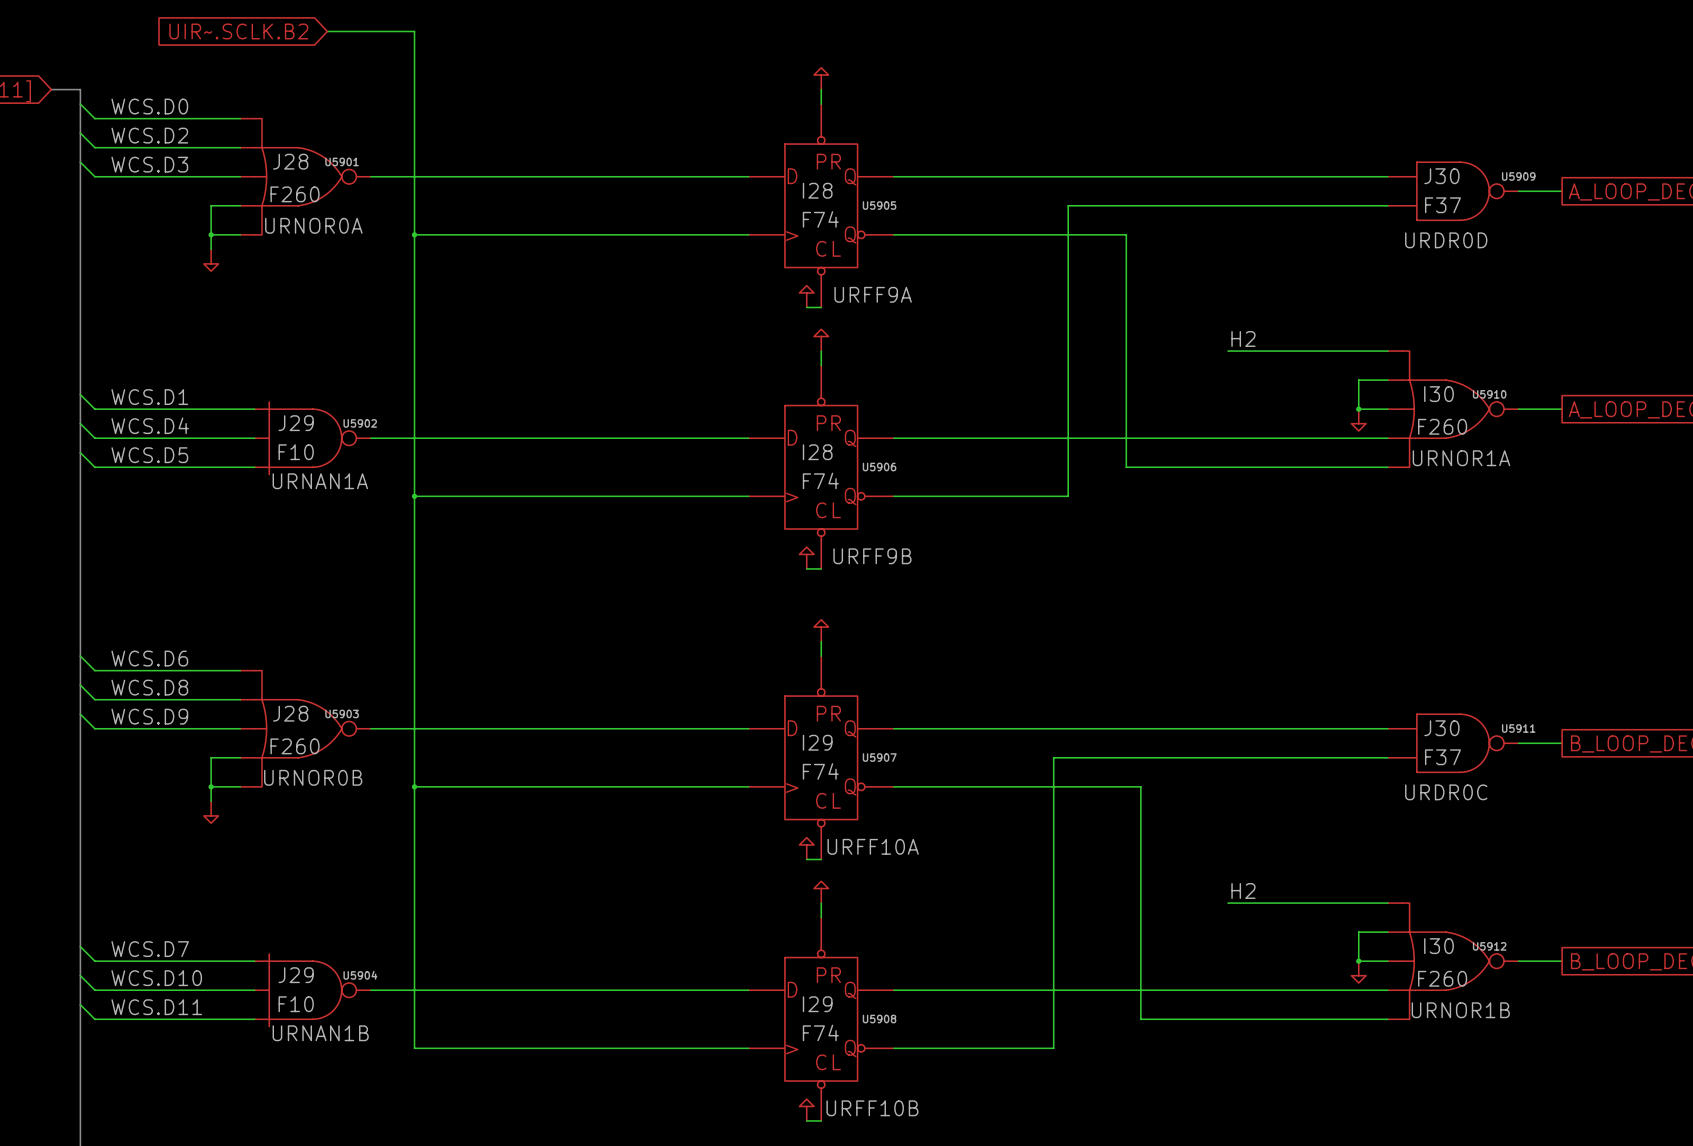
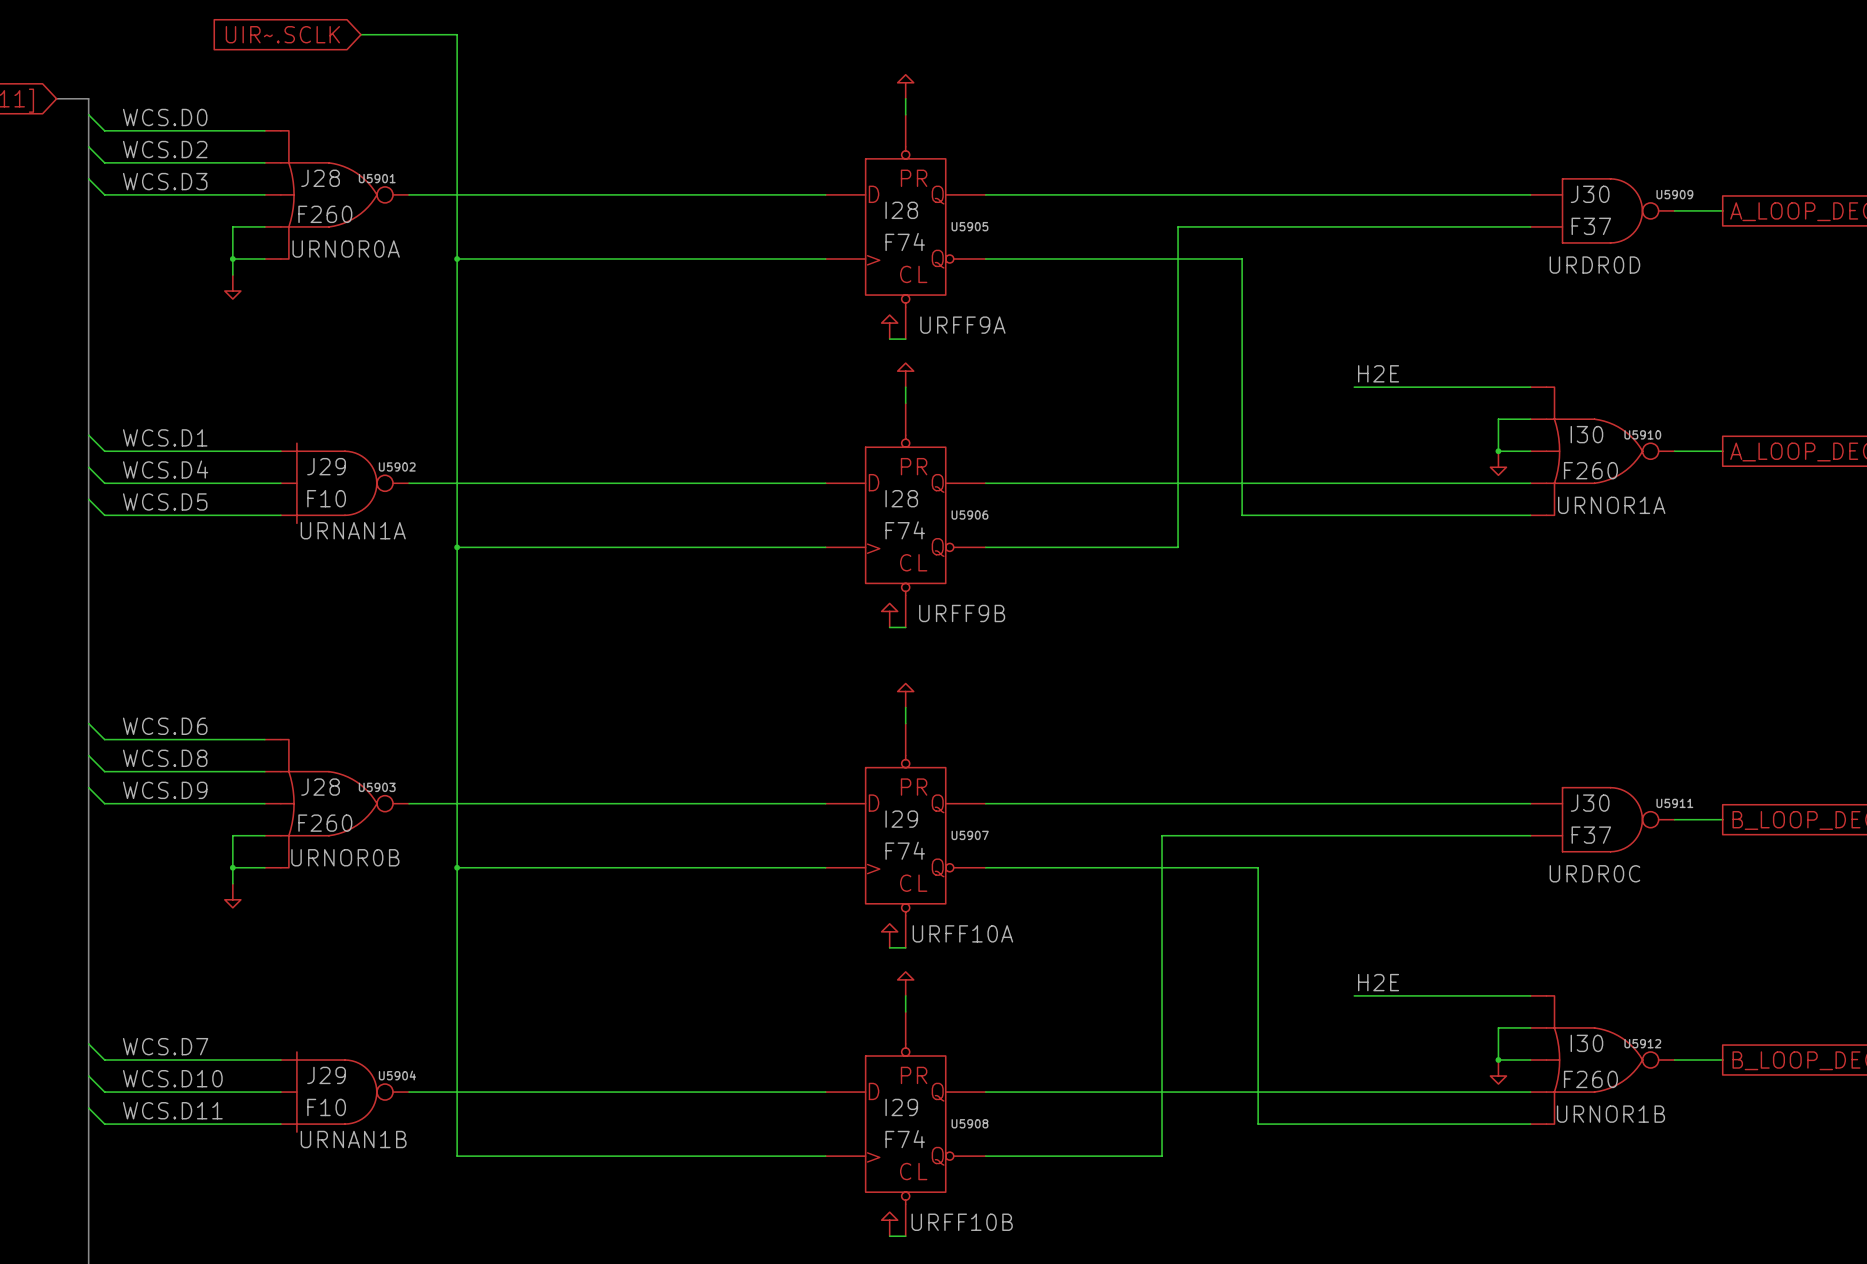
global label: UIR~.SCLK.B2 (238, 31) -> UIR~.SCLK (282, 34)
label: H2 (1243, 338) -> H2E (1378, 373)
label: H2 (1243, 890) -> H2E (1378, 982)

